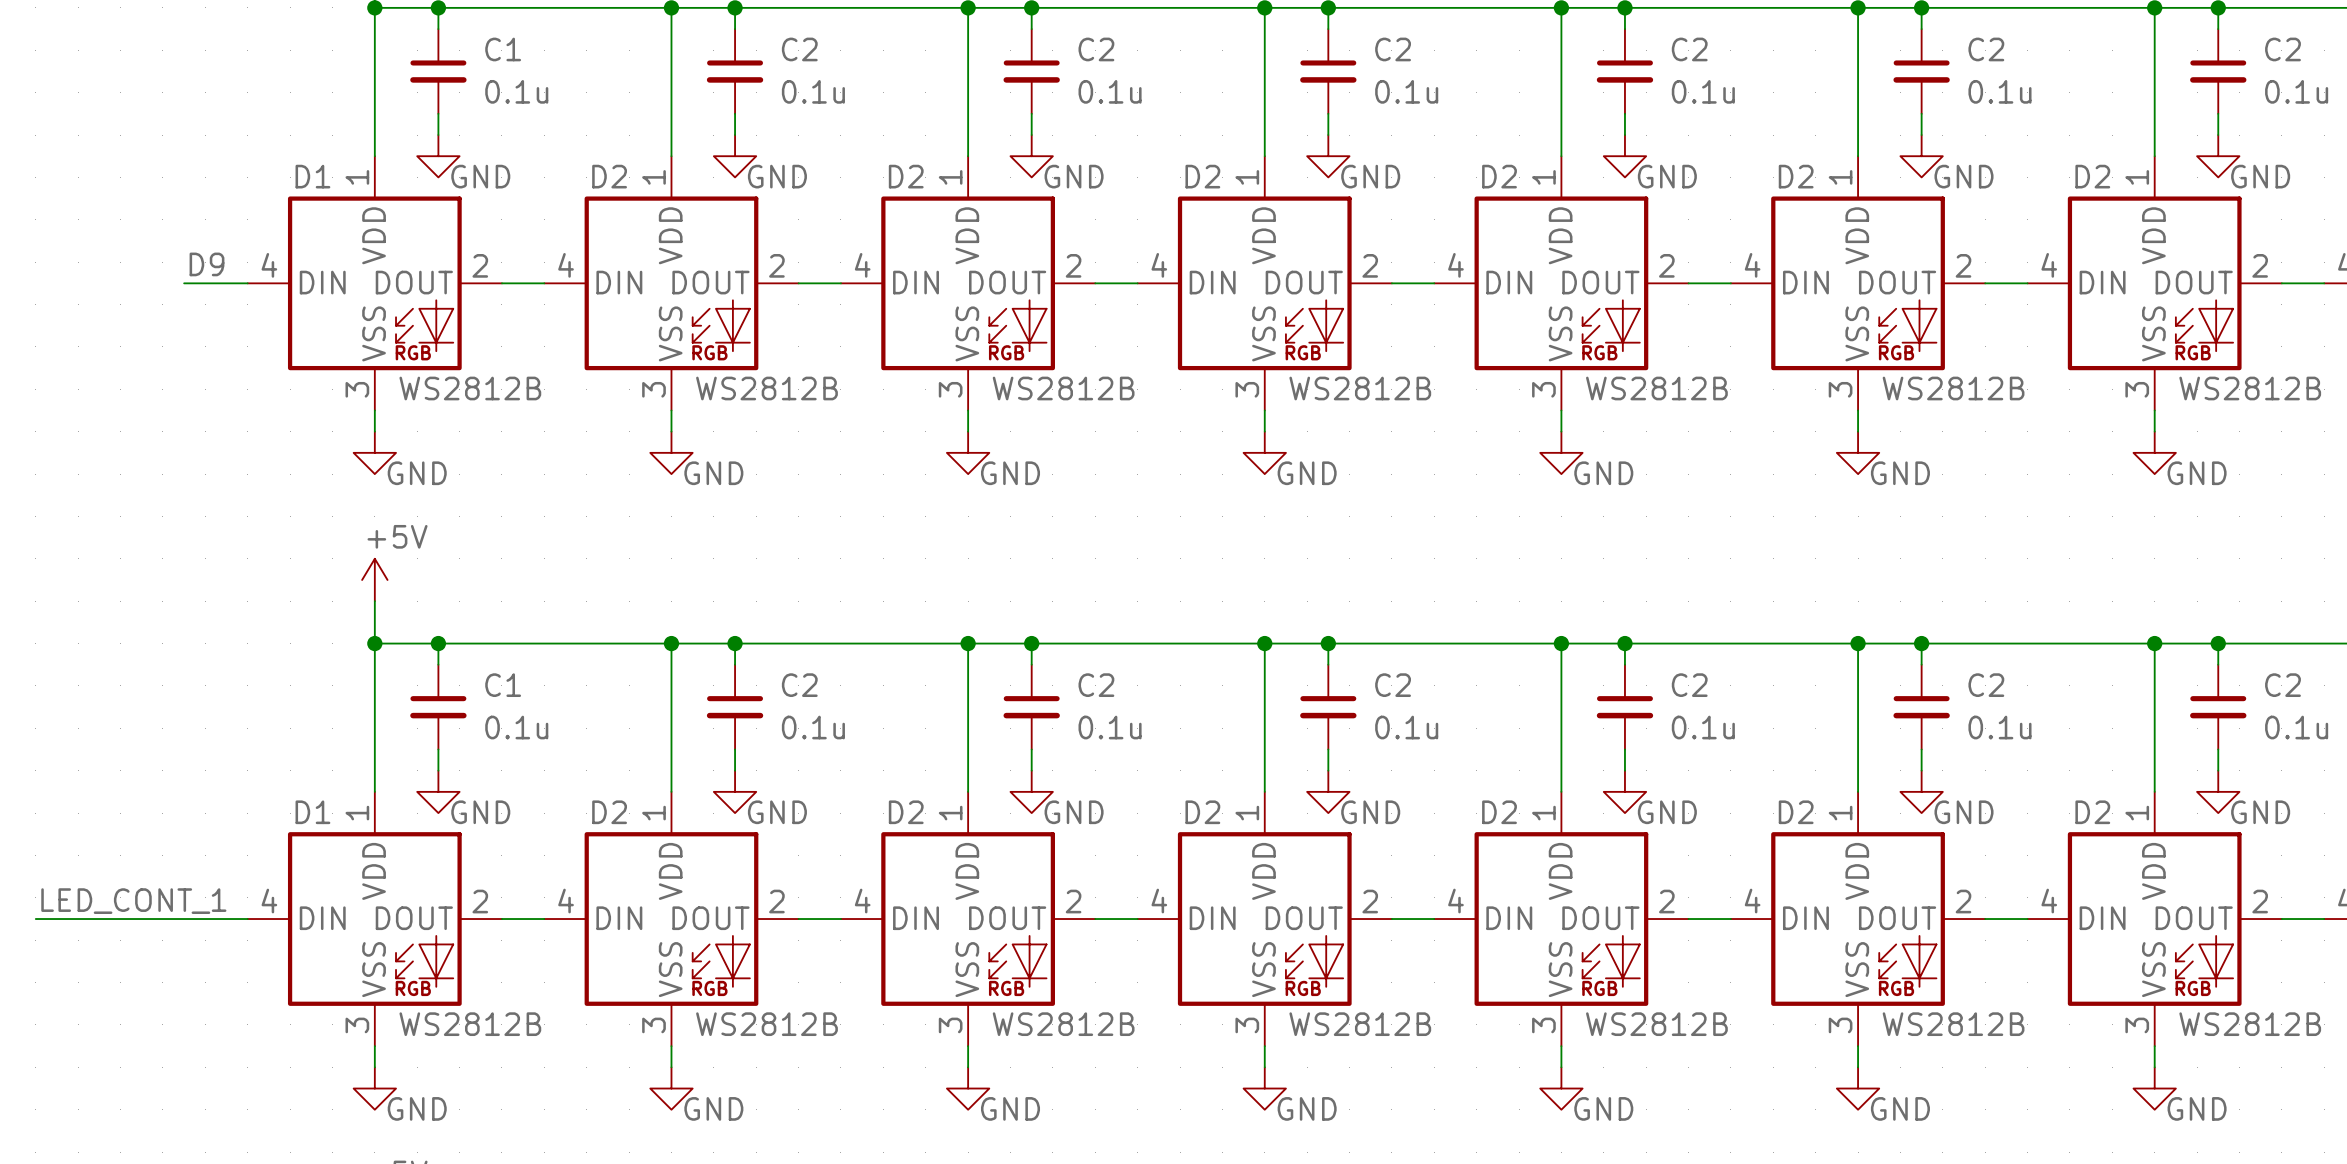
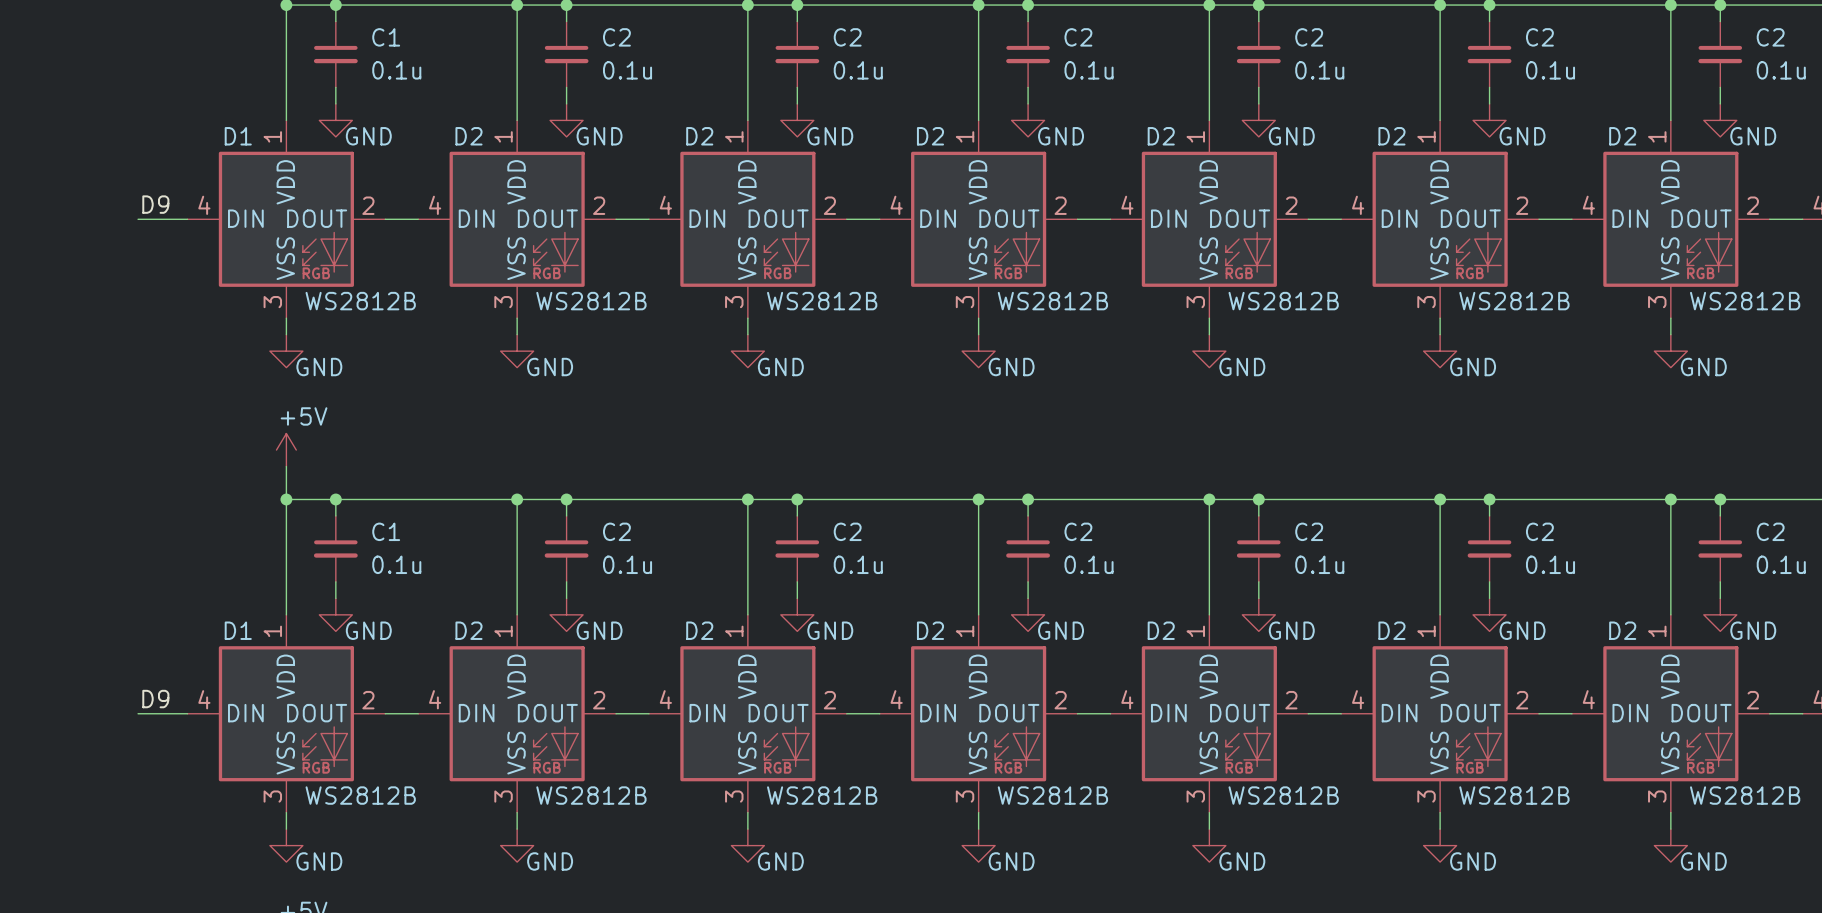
label: none -> D9 (155, 699)
label: LED_CONT_1 (133, 901) -> none
wire: (35, 919) (184, 919) -> none

